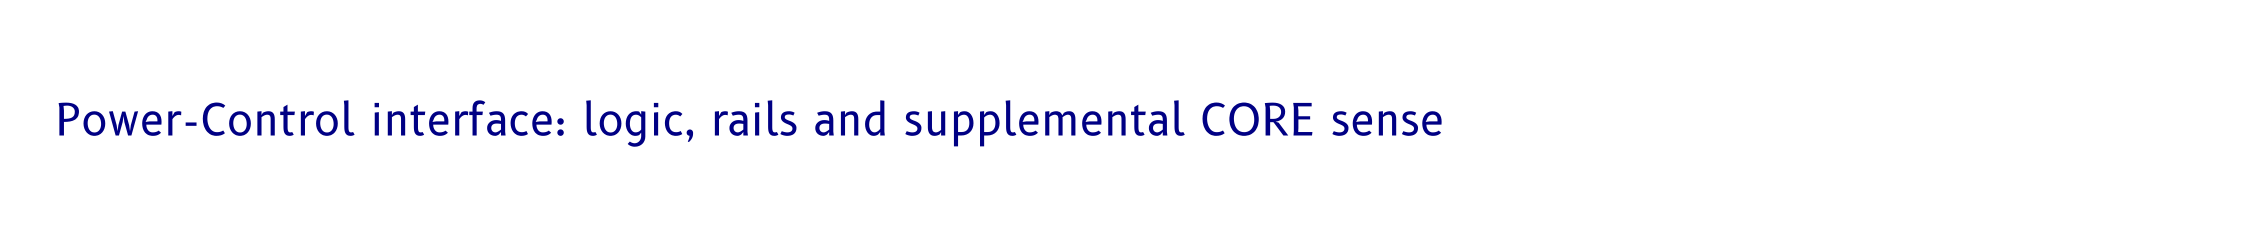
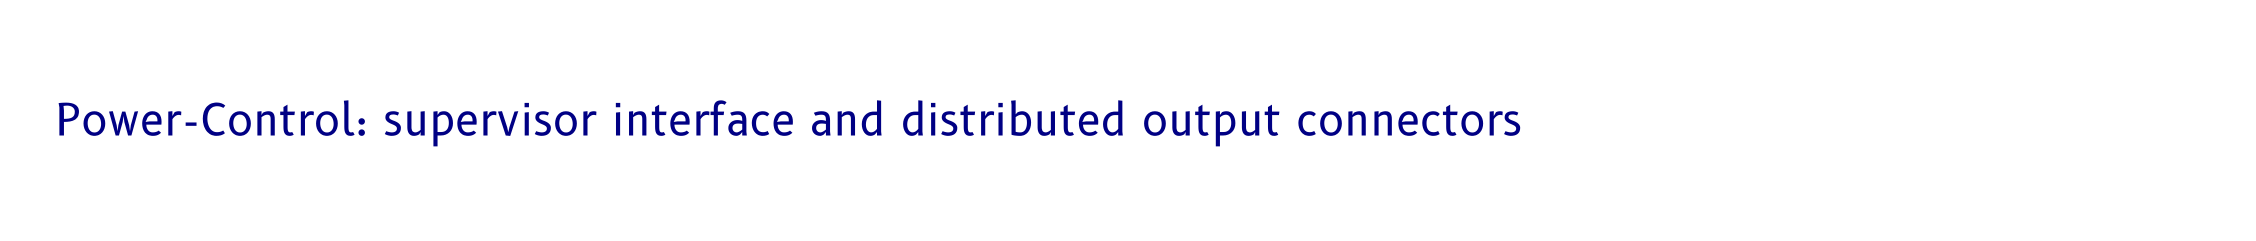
text: Power-Control interface: logic, rails and supplemental CORE sense (750, 123) -> Power-Control: supervisor interface and distributed output connectors (789, 123)

